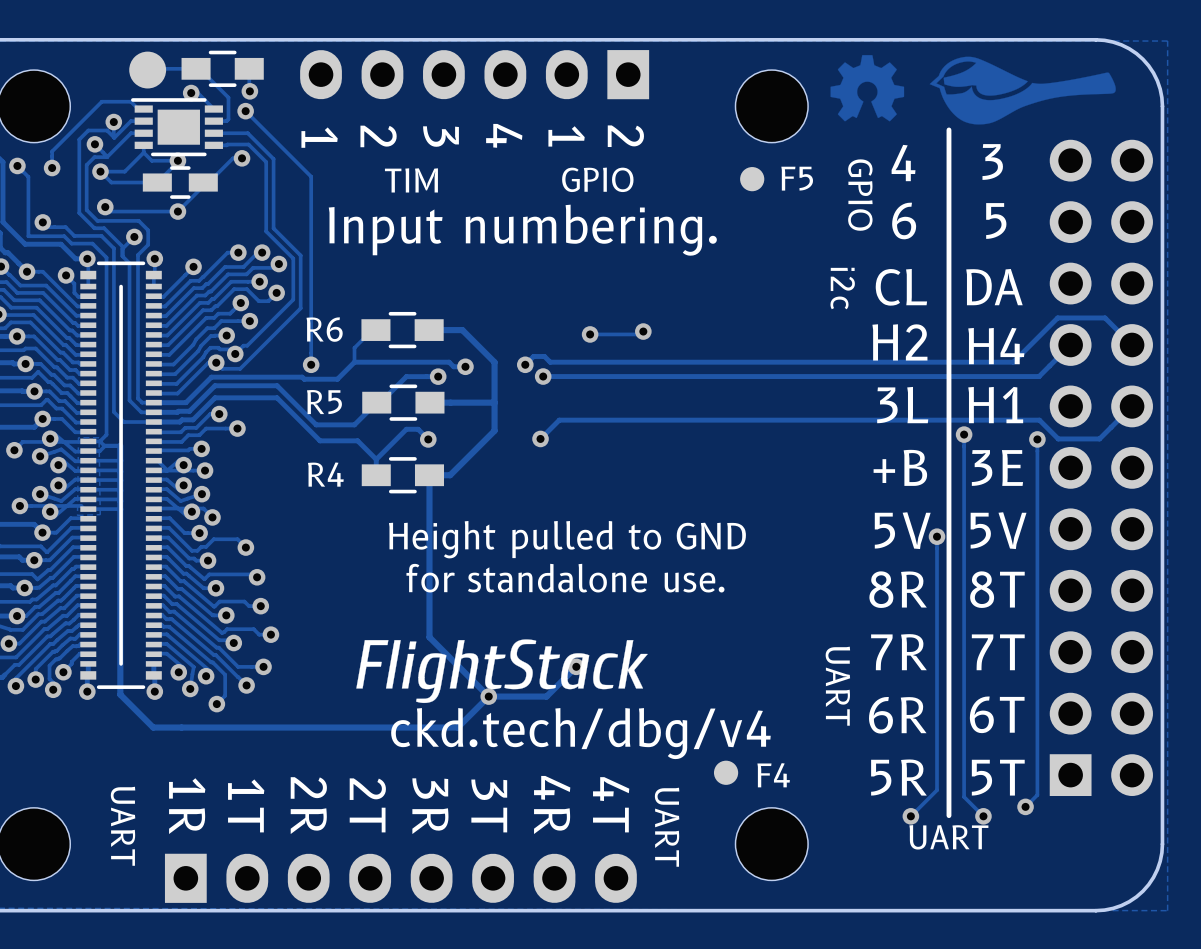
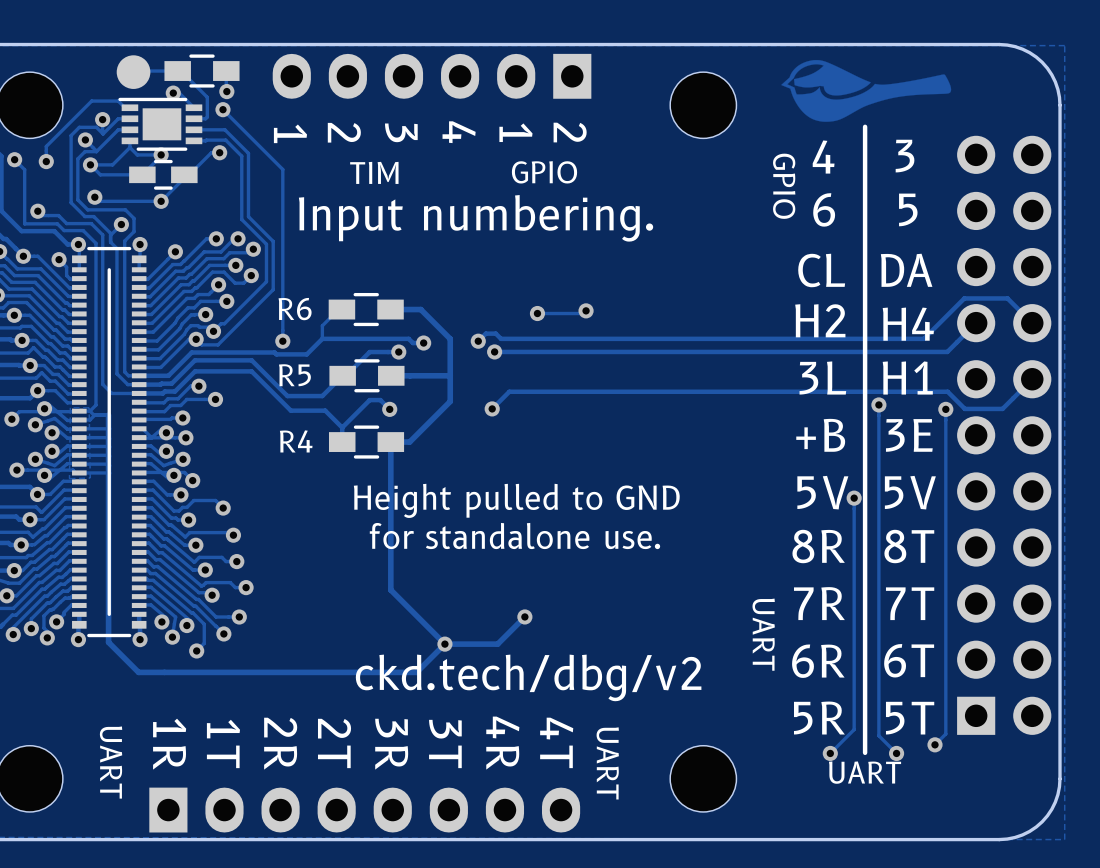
drawing: [830, 55, 905, 122] -> none
drawing position: (1022, 90) -> (866, 90)
F5: (752, 179) -> none
text: i2c (842, 288) -> none
drawing: [356, 639, 648, 704] -> none
text: ckd.tech/dbg/v4 (580, 733) -> ckd.tech/dbg/v2 (528, 677)
F4: (726, 772) -> none

